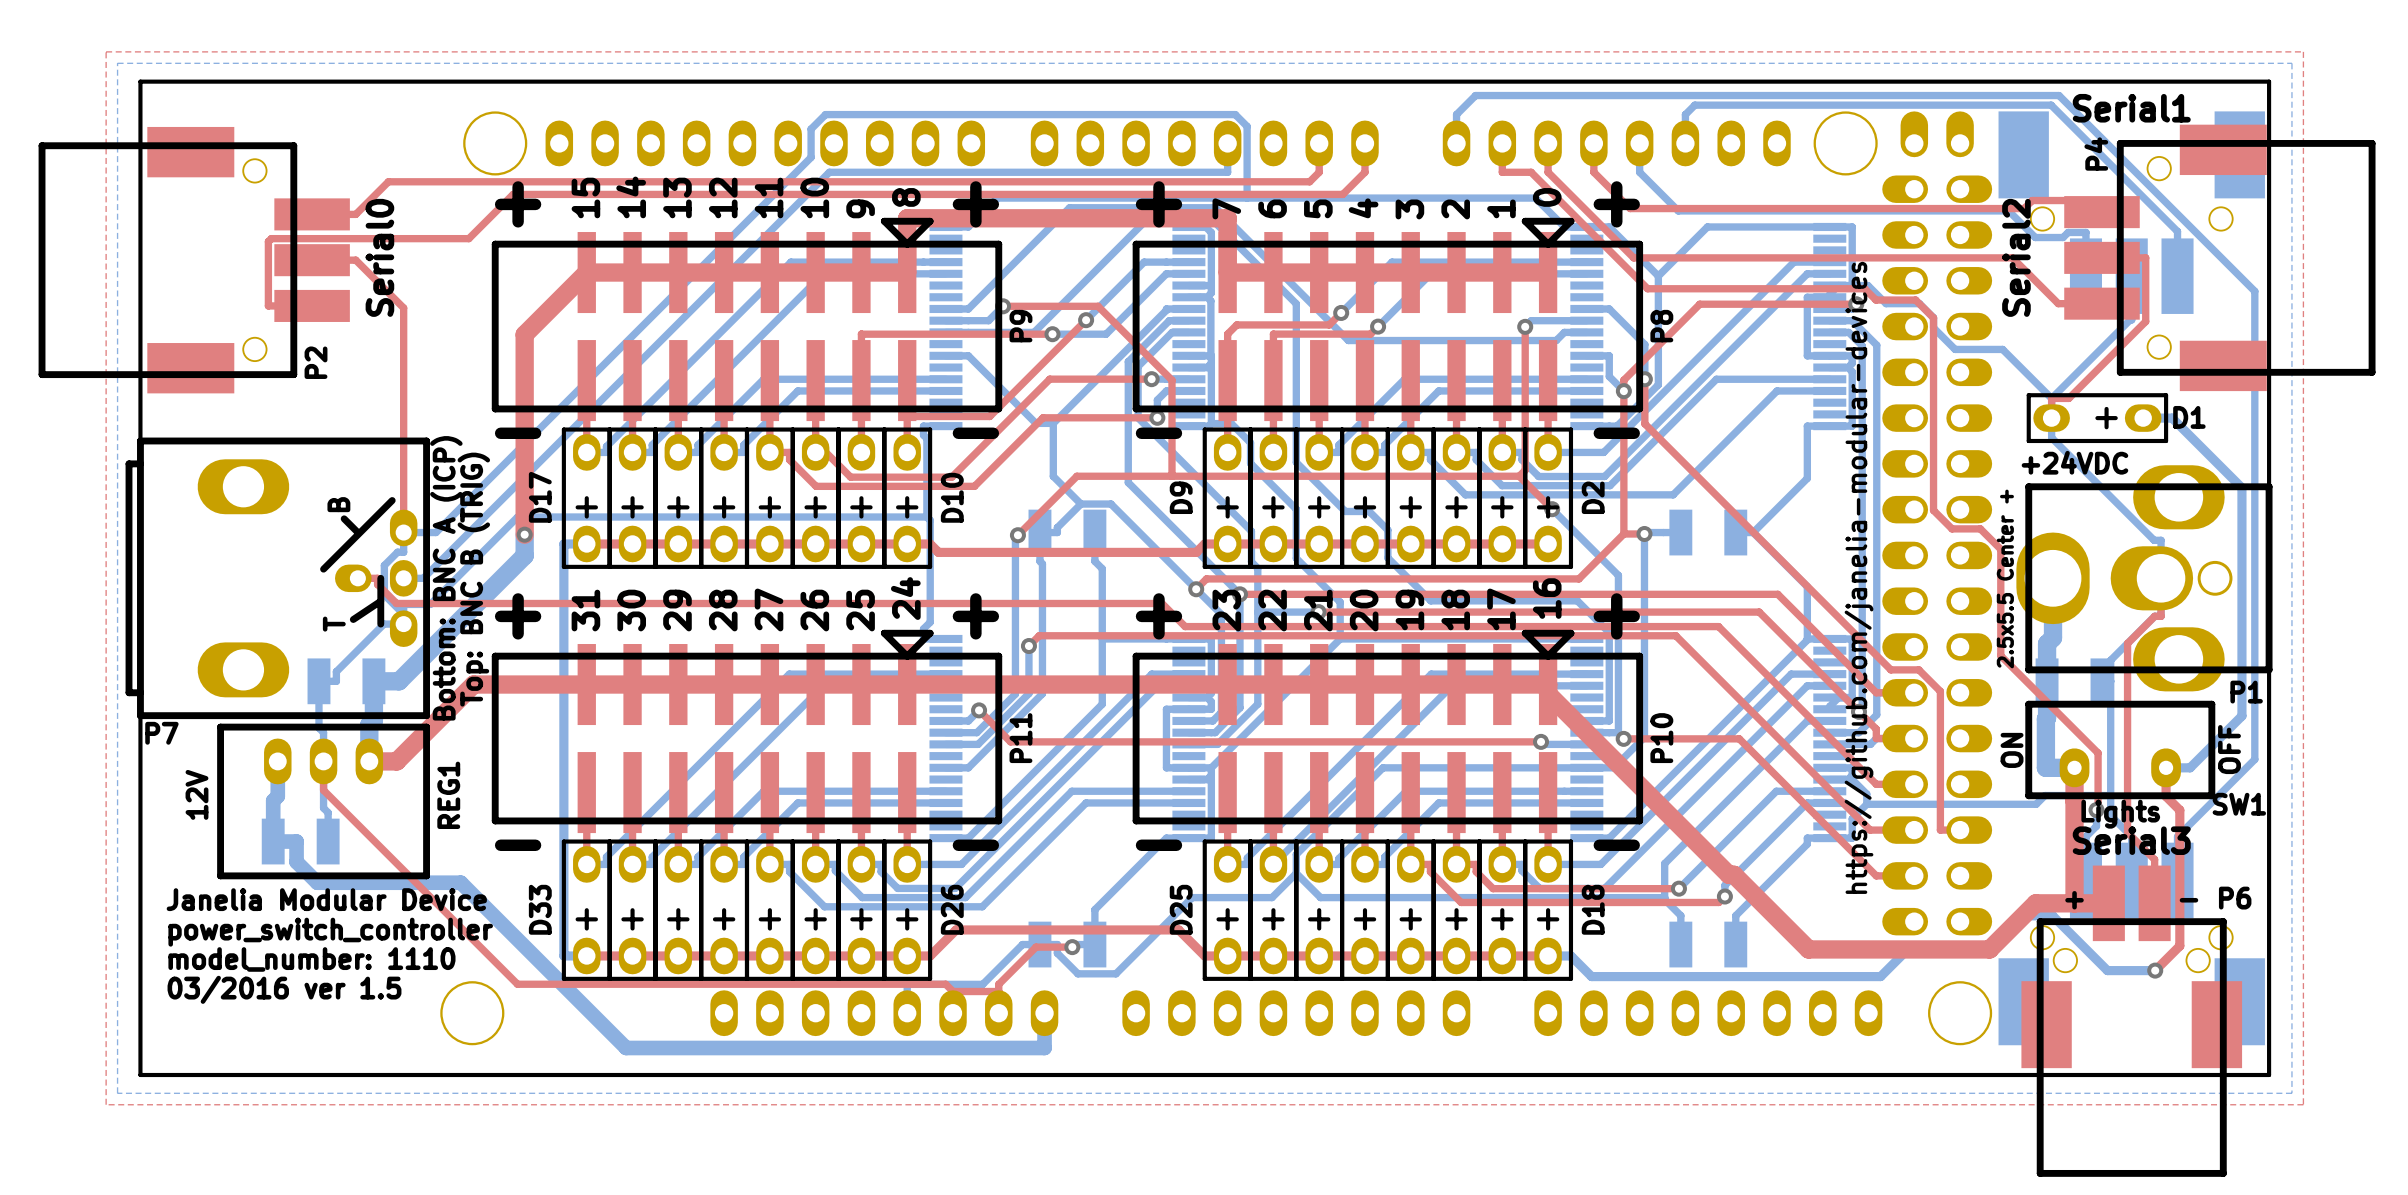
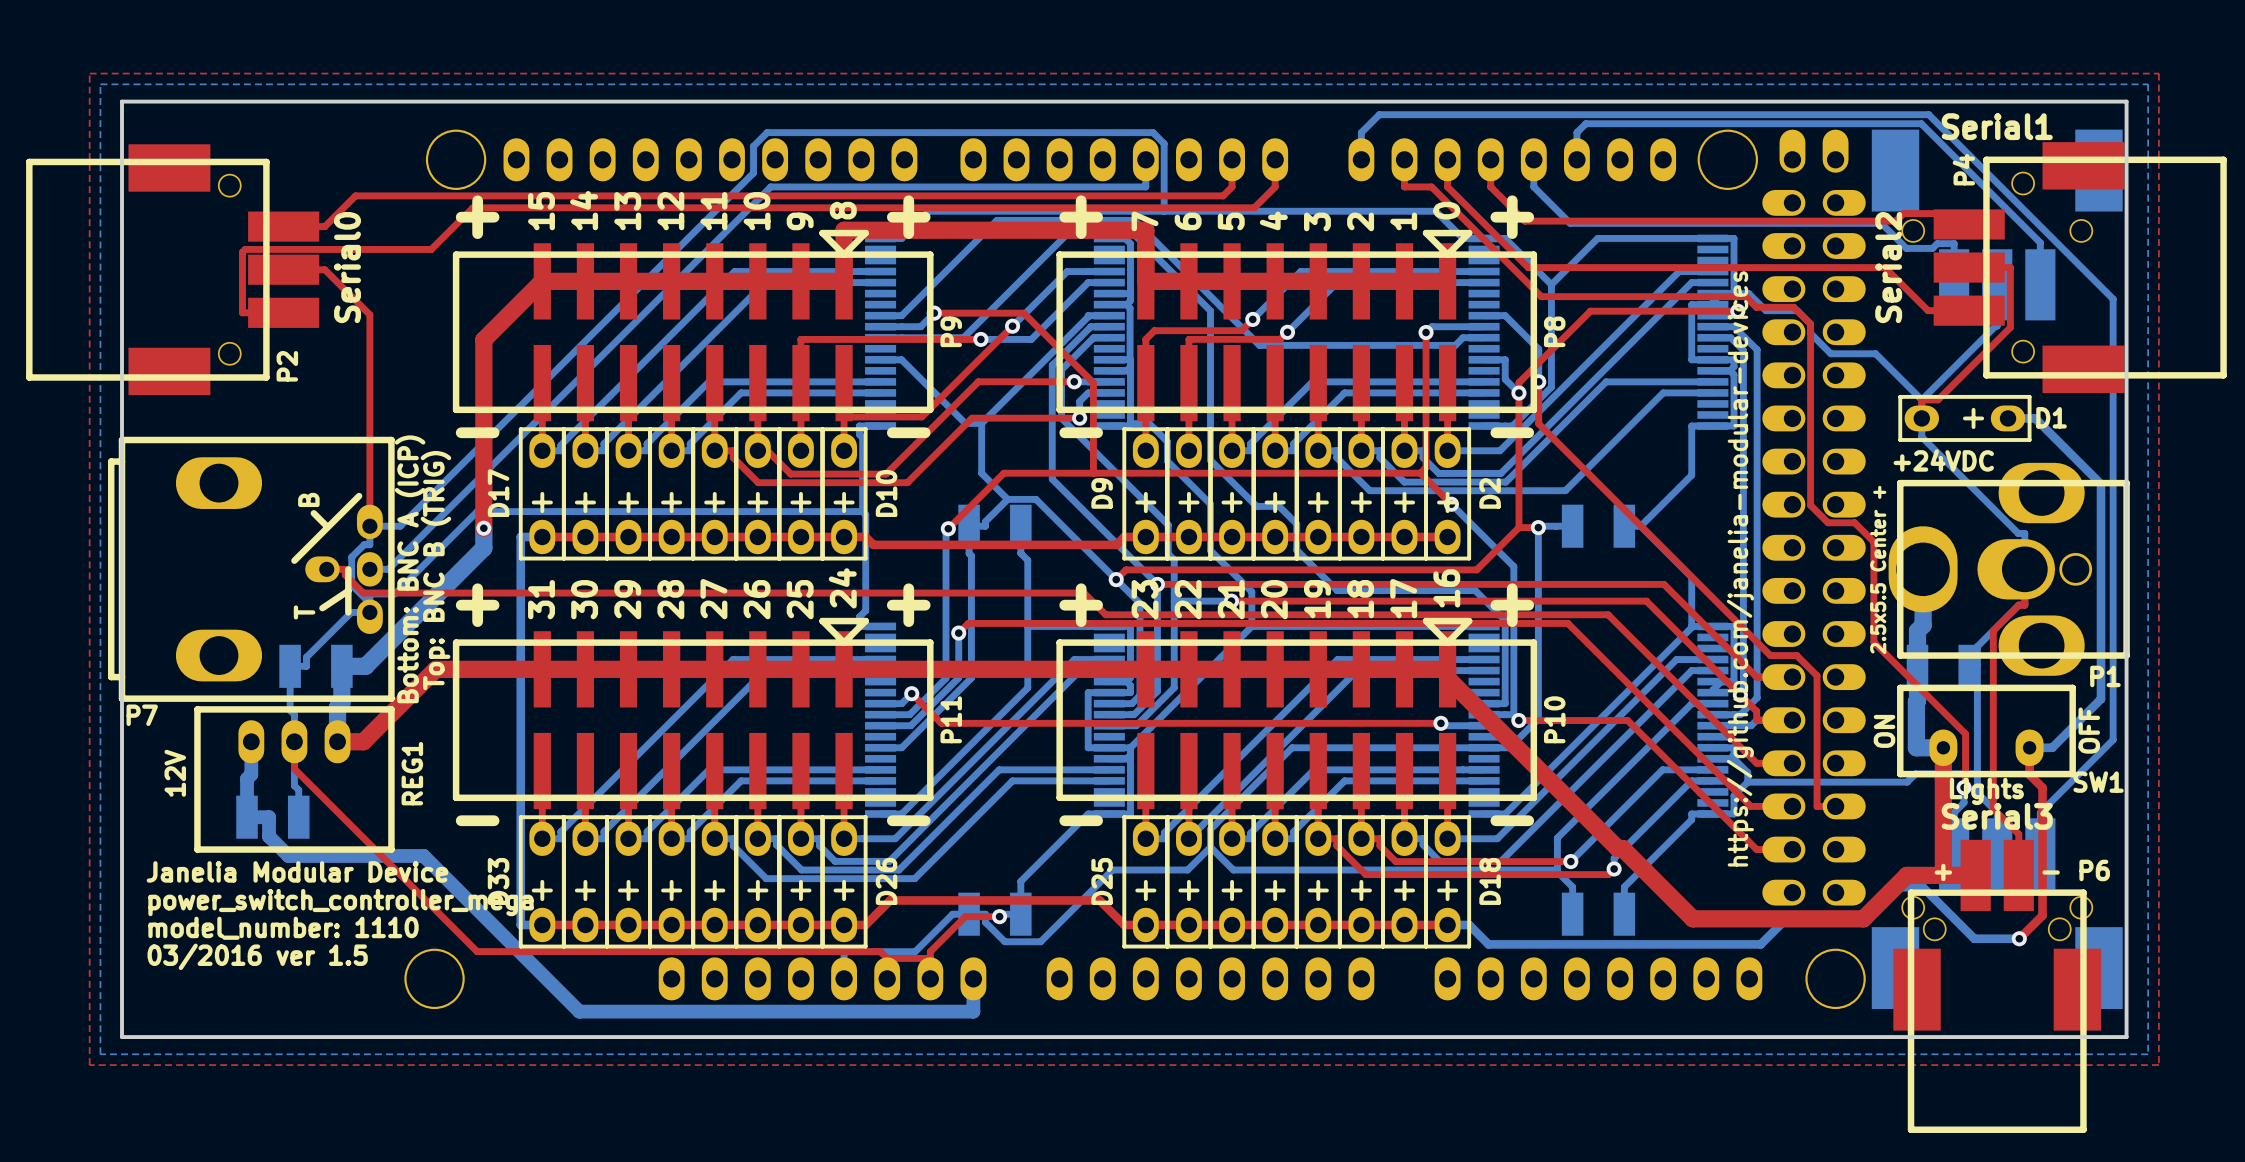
text: power_switch_controller (330, 932) -> power_switch_controller_mega (341, 902)

